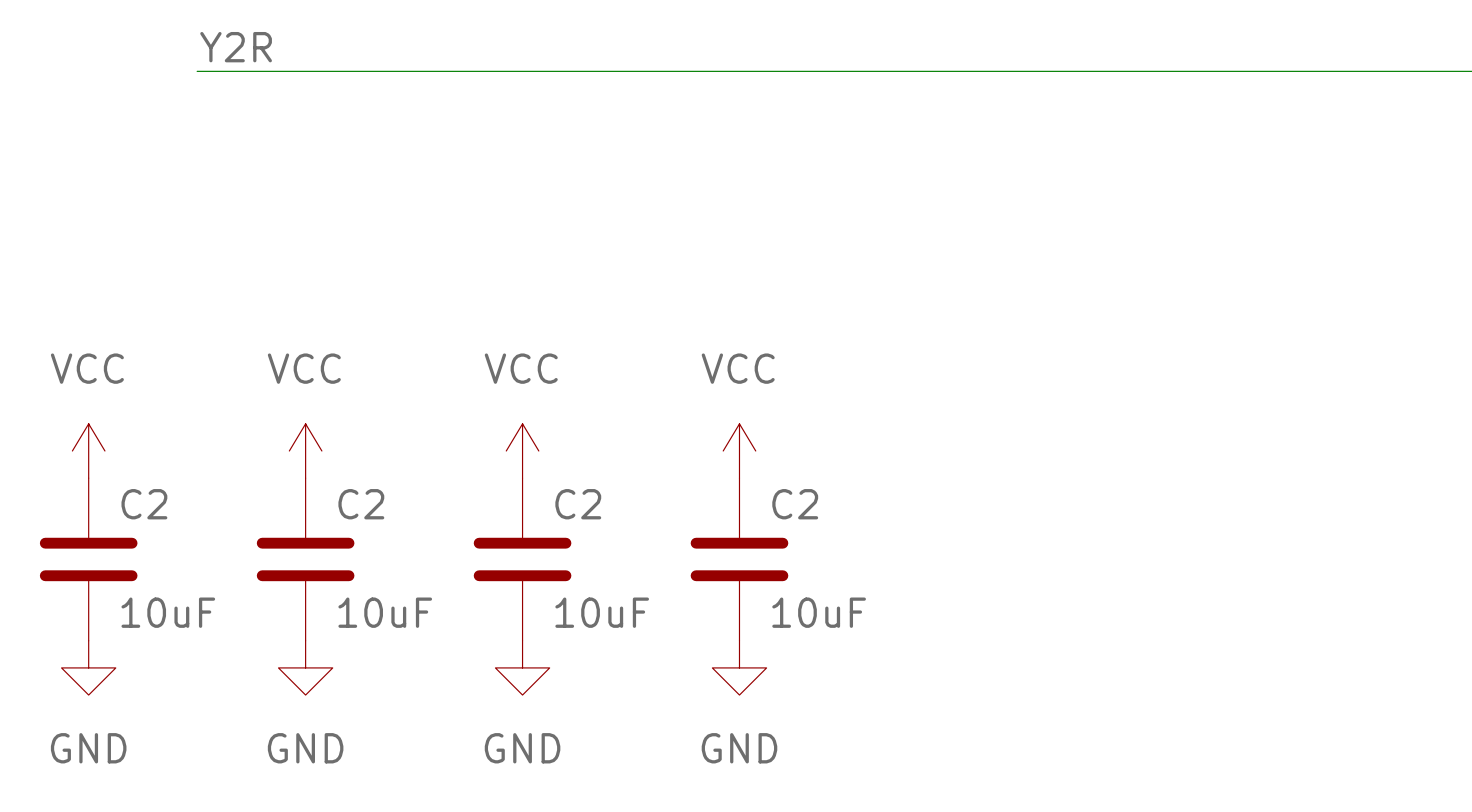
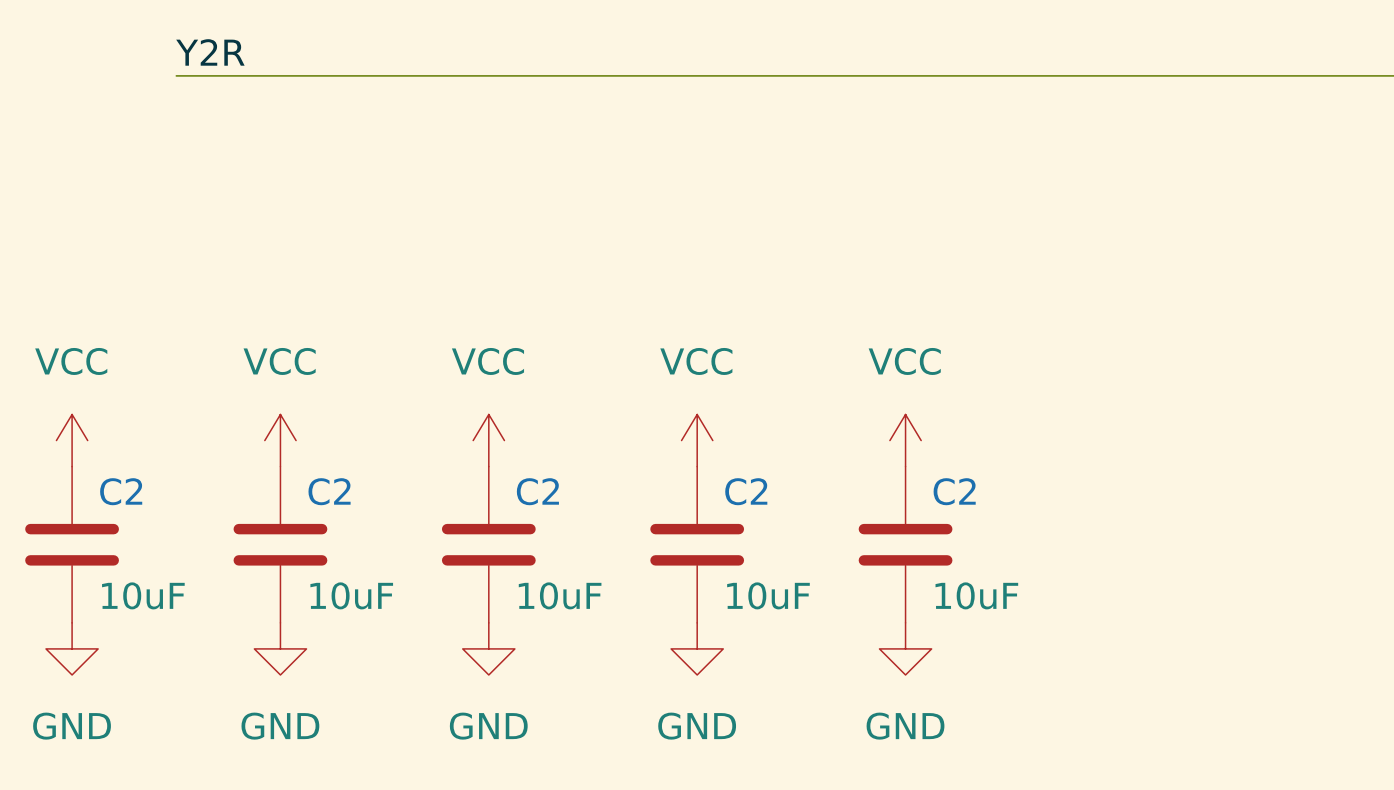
power symbol: none -> VCC (905, 440)
C2: none -> 10uF (905, 544)
power symbol: none -> GND (905, 648)

